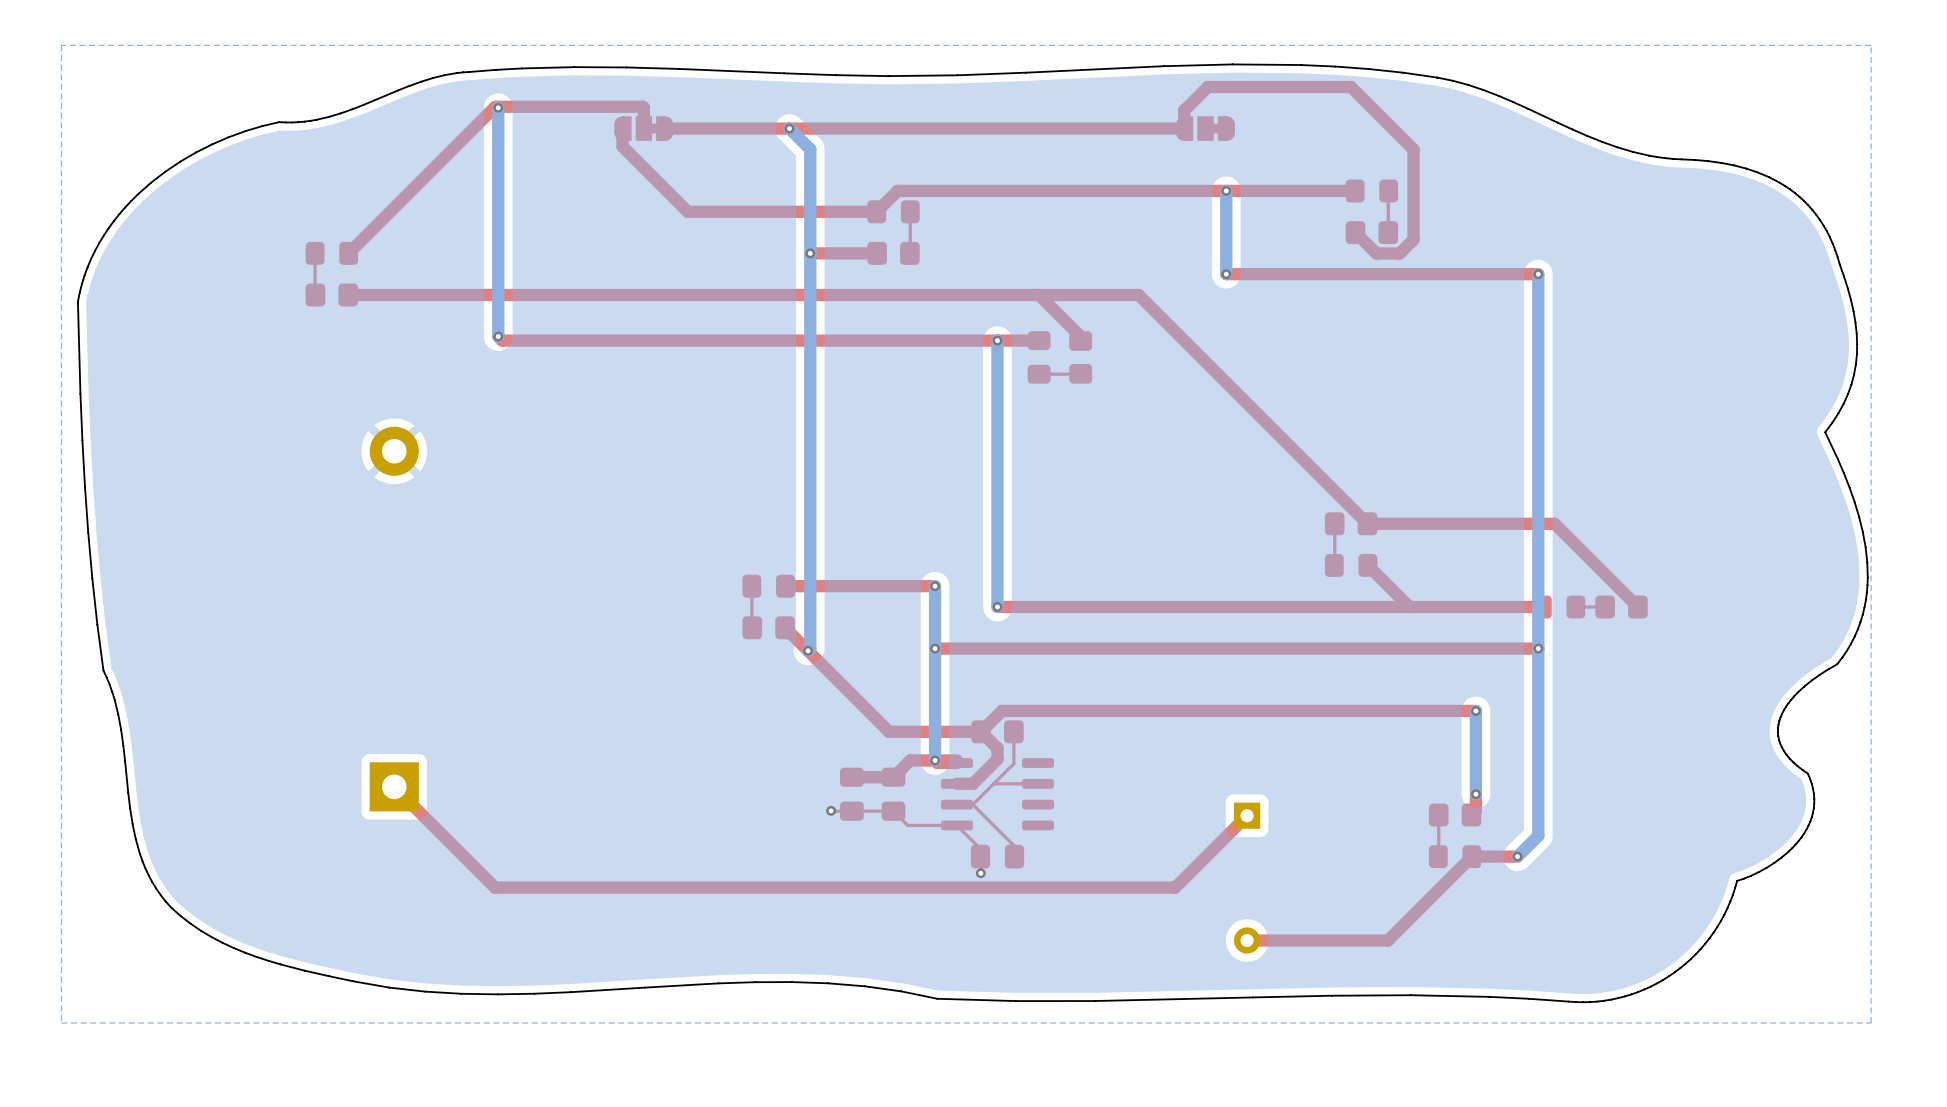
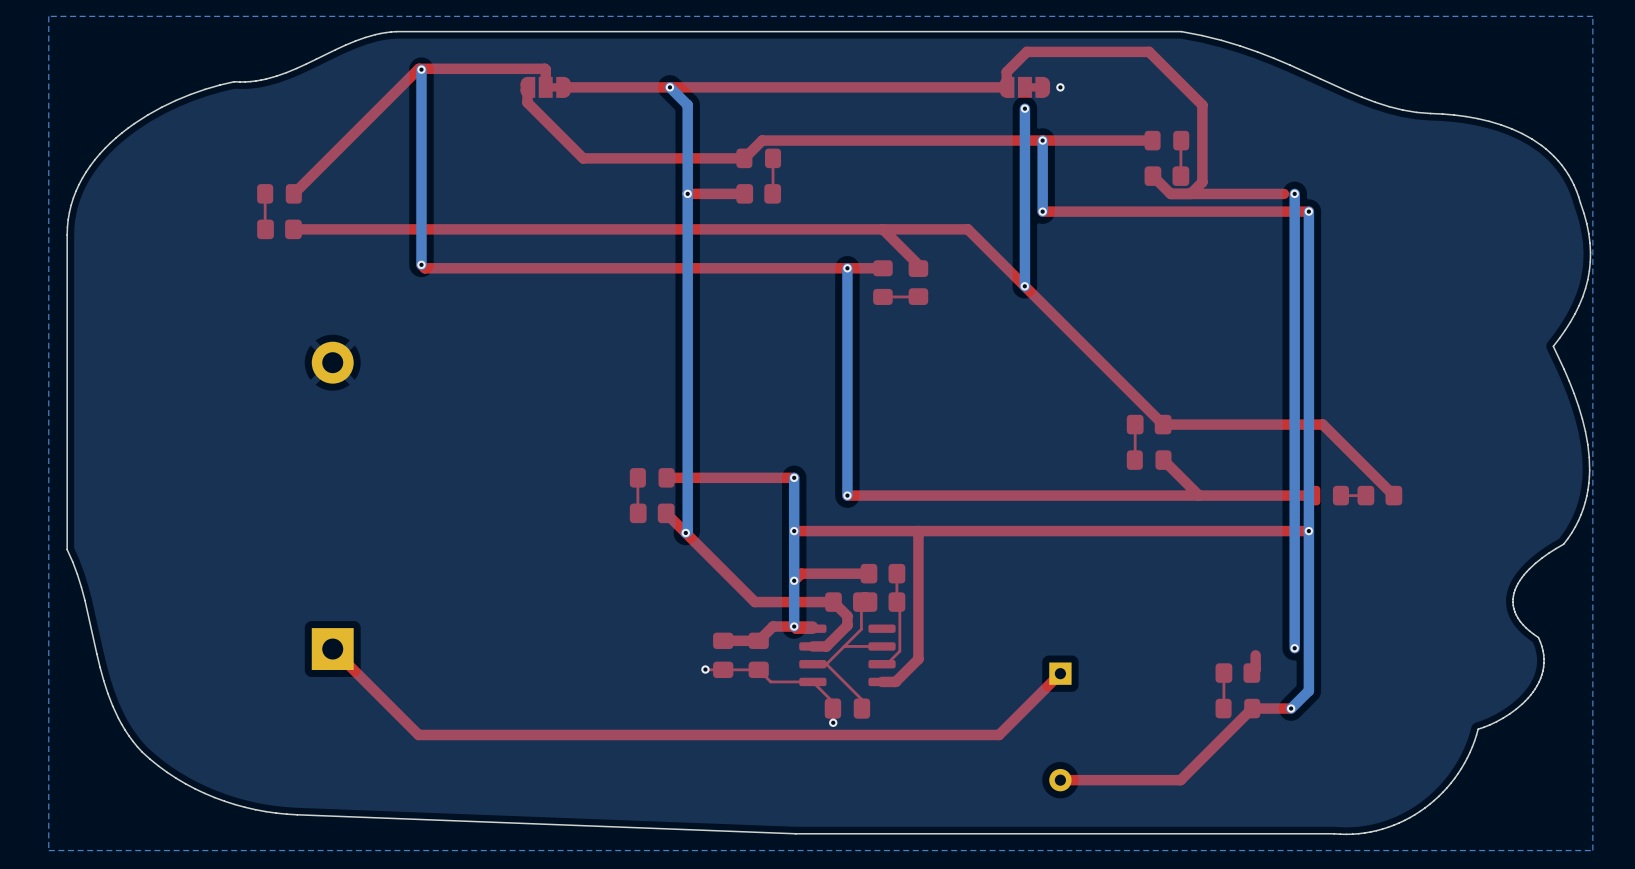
board edge: (1232, 64) (1301, 65) (1369, 69) (1437, 77) (1468, 84) (1498, 95) (1587, 135) (1617, 147) (1656, 157) (1721, 162) (1757, 172) (1779, 182) (1799, 196) (1816, 214) (1829, 237) (1851, 300) (1857, 343) (1854, 374) (1848, 394) (1838, 413) (1825, 432) (1849, 487) (1862, 532) (1867, 577) (1864, 607) (1854, 636) (1842, 657) (1837, 664) (1811, 680) (1797, 693) (1786, 706) (1779, 721) (1778, 735) (1781, 747) (1793, 762) (1807, 773) (1811, 783) (1814, 803) (1808, 825) (1798, 841) (1781, 857) (1758, 872) (1737, 880) (1730, 901) (1717, 926) (1700, 949) (1680, 968) (1657, 983) (1631, 994) (1604, 1000) (1582, 1002) (1489, 996) (1410, 995) (1016, 1001) (937, 998) (864, 986) (791, 982) (718, 983) (534, 993) (461, 993) (389, 987) (328, 976) (268, 960) (233, 947) (200, 930) (171, 907) (160, 895) (145, 868) (135, 839) (118, 714) (103, 670) (92, 578) (84, 486) (77, 301) (87, 267) (103, 235) (125, 207) (151, 182) (196, 152) (245, 131) (279, 122) (304, 121) (328, 116) (421, 81) (457, 73) (521, 68) (626, 67) (888, 76) (957, 75) (1232, 64) -> (1181, 31) (1221, 40) (1257, 51) (1361, 97) (1389, 106) (1416, 112) (1477, 118) (1511, 128) (1541, 145) (1558, 160) (1574, 185) (1584, 213) (1590, 243) (1587, 279) (1575, 313) (1553, 346) (1574, 393) (1585, 431) (1589, 457) (1588, 489) (1581, 514) (1567, 538) (1563, 544) (1541, 558) (1526, 571) (1516, 586) (1513, 599) (1513, 608) (1518, 618) (1538, 637) (1540, 642) (1544, 659) (1541, 674) (1533, 692) (1516, 709) (1496, 721) (1478, 729) (1470, 752) (1458, 773) (1442, 792) (1420, 811) (1399, 822) (1382, 829) (1346, 834) (795, 833) (297, 814) (245, 807) (204, 793) (176, 778) (158, 766) (142, 752) (128, 735) (118, 718) (107, 693) (81, 587) (67, 549) (67, 234) (71, 205) (82, 178) (104, 148) (134, 123) (161, 107) (190, 94) (234, 81) (255, 80) (276, 76) (355, 41) (391, 31) (1181, 31)
via: none -> (1060, 87)
bottom track: none -> (1024, 108) (1024, 286)
via: none -> (1024, 108)
top track: none -> (1283, 193) (1190, 193)
bottom track: none -> (1294, 193) (1294, 648)
via: none -> (1294, 193)
via: none -> (1024, 286)
top track: none -> (918, 531) (918, 659) (895, 681) (882, 681)
top track: none -> (868, 573) (801, 573) (794, 580)
part: none -> (882, 573)
top track: none -> (896, 573) (896, 602) (899, 605) (899, 651) (886, 664) (882, 664)
via: none -> (794, 580)
top track: (1475, 710) (1001, 710) (981, 731) -> none
bottom track: (1475, 711) (1475, 794) -> none
via: (1475, 711) -> none
part: none -> (882, 602)
via: none -> (1294, 648)
via: (1475, 794) -> none

